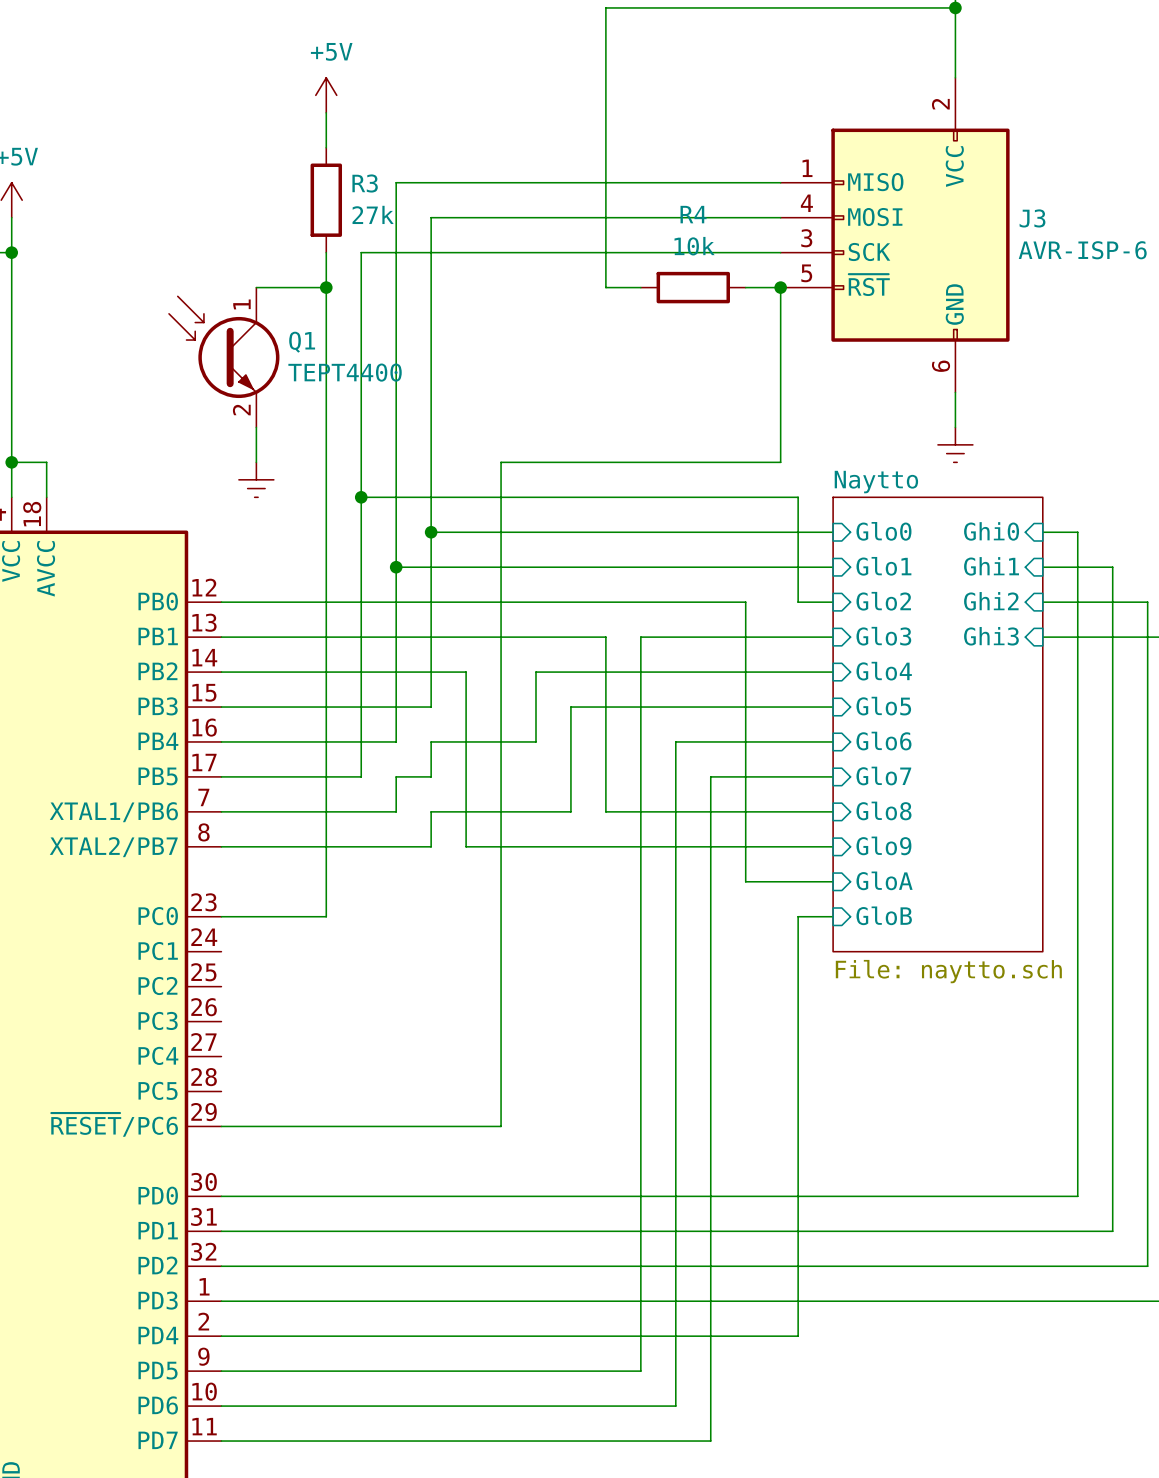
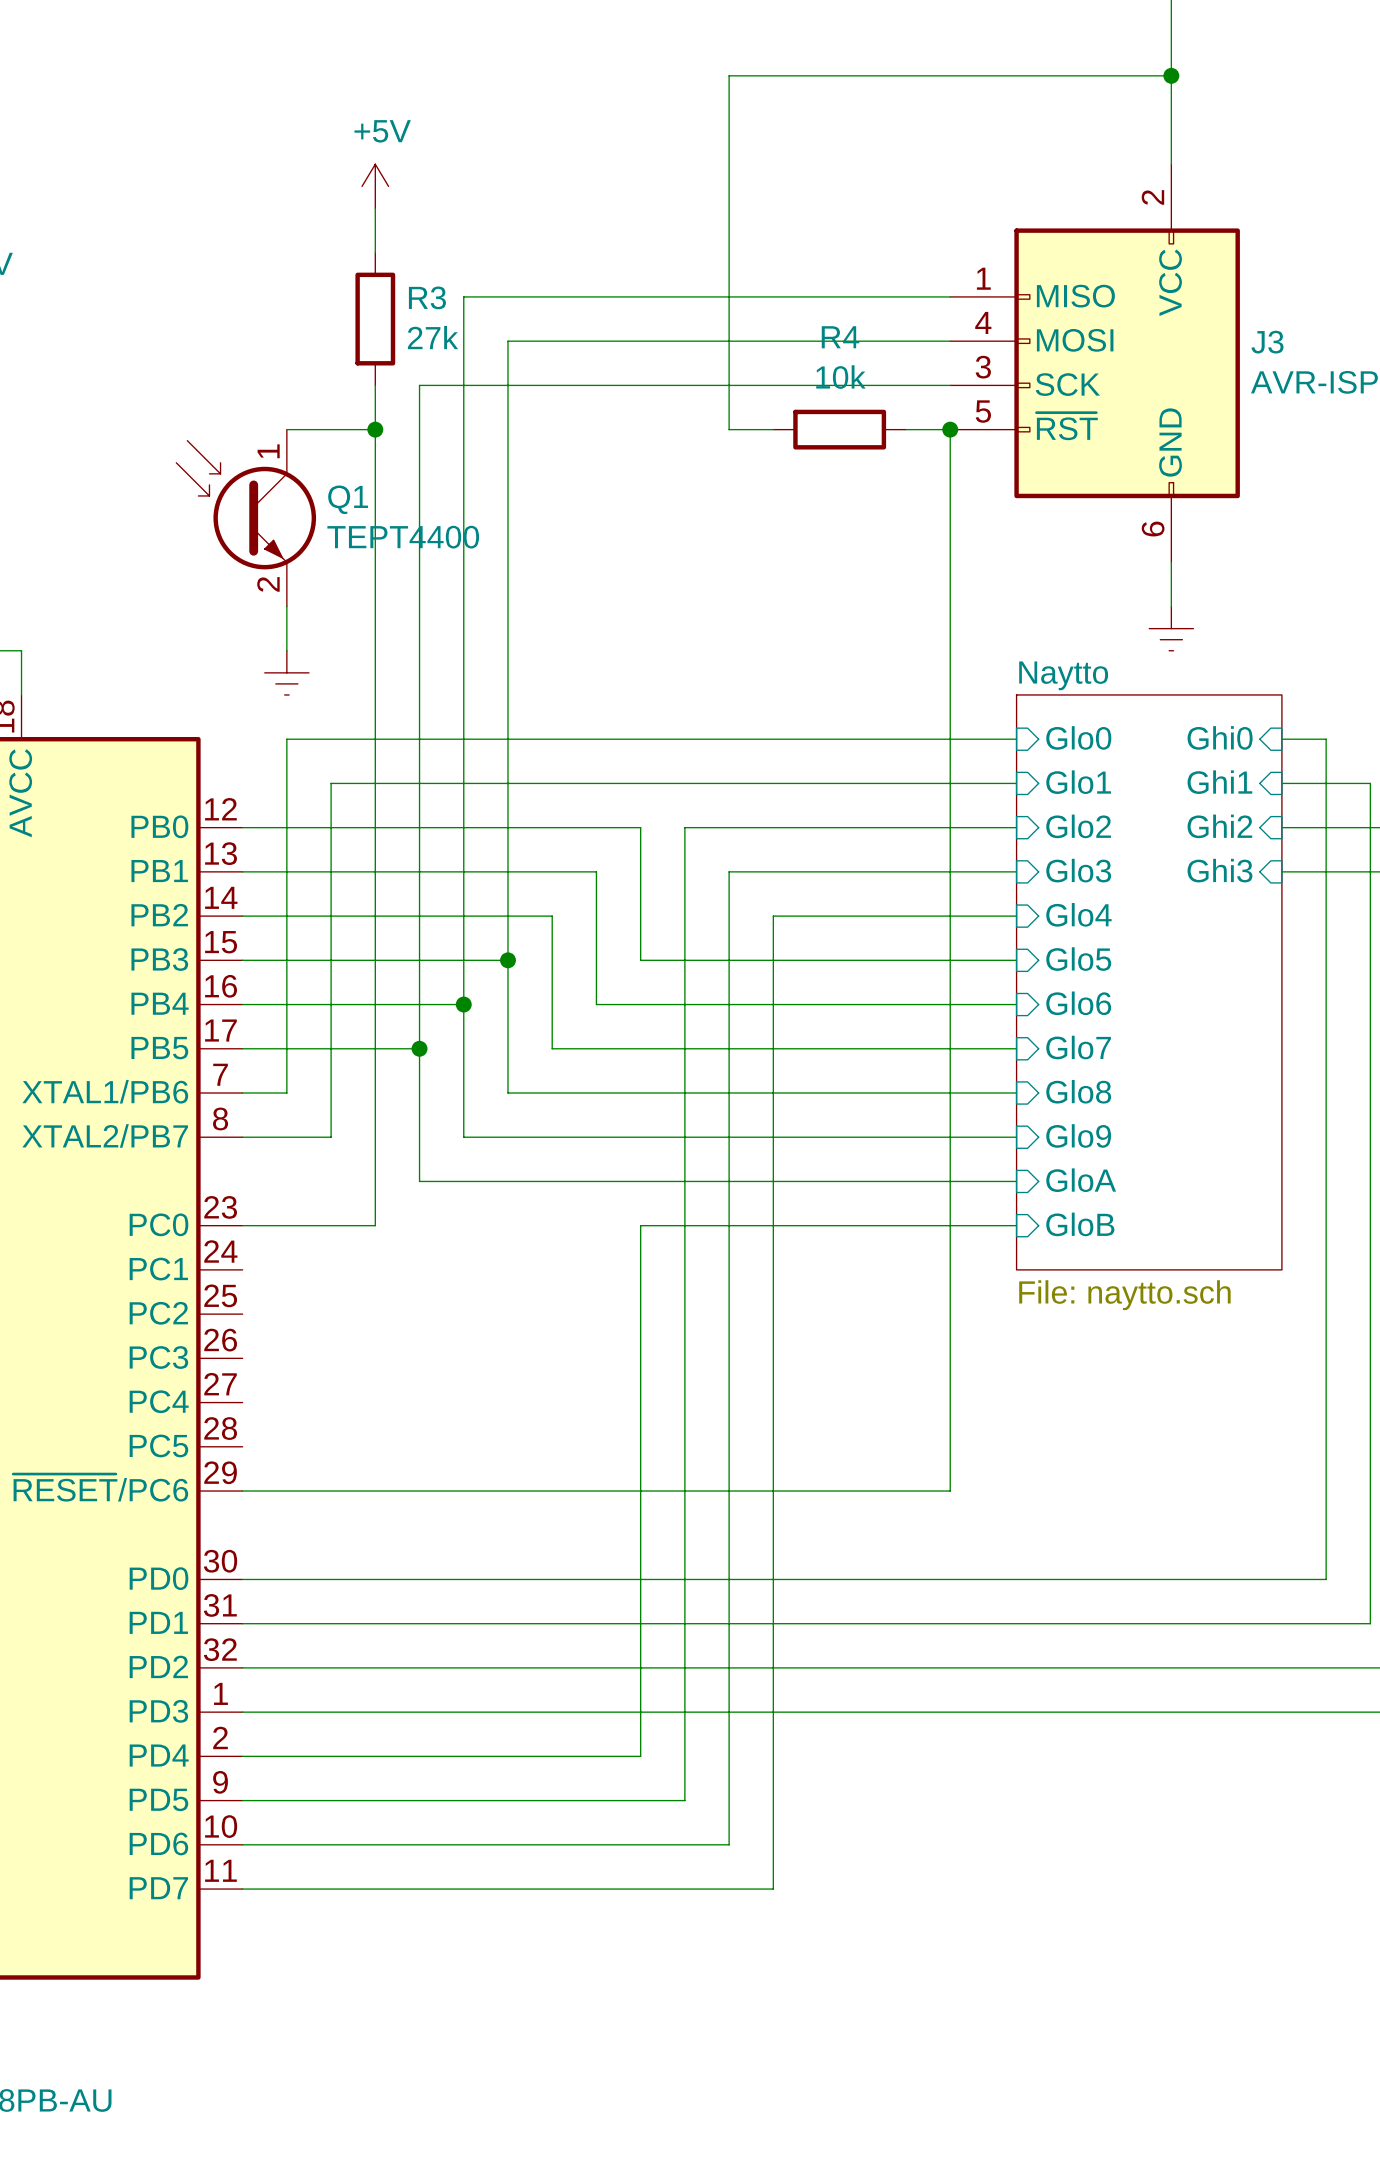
wire: (780, 462) (501, 462) (501, 637) (605, 637) -> (950, 650) (950, 1491) (596, 1491)
wire: (361, 497) (798, 497) (798, 602) -> none
junction: (361, 497) -> none
junction: (431, 532) -> none
wire: none -> (463, 783) (331, 783) (331, 1137)
junction: (396, 567) -> none
wire: (535, 602) (570, 602) -> (640, 827) (640, 916)
wire: (745, 602) (745, 881) -> (906, 827) (972, 827)
wire: (640, 637) (640, 672) (535, 672) -> (773, 871) (729, 871)
junction: none -> (507, 960)
wire: (535, 707) (535, 741) -> (640, 960) (684, 960) (684, 827)
wire: none -> (463, 1004) (463, 1048)
junction: none -> (463, 1004)
wire: (431, 741) (501, 741) (501, 1126) -> (507, 1004) (507, 960)
wire: (675, 741) (675, 1406) (605, 1406) -> (817, 1004) (640, 1004)
wire: none -> (419, 1048) (419, 1181) (906, 1181)
junction: none -> (419, 1048)
wire: (396, 776) (431, 776) -> (507, 1093) (507, 1048)
wire: (466, 776) (466, 846) -> (552, 1048) (861, 1048)
wire: (710, 776) (710, 1441) (640, 1441) -> (773, 1800) (773, 1889)
wire: (256, 811) (396, 811) -> (286, 1093) (286, 739) (507, 739)
wire: (431, 811) (431, 846) -> (552, 1137) (507, 1137)
wire: (291, 846) (396, 846) -> (463, 1093) (463, 1137)
wire: (798, 916) (798, 1336) (535, 1336) -> (972, 1225) (640, 1225) (640, 1756)
wire: (570, 1371) (640, 1371) -> (684, 1800) (684, 1093) (729, 1093) (729, 1844)

